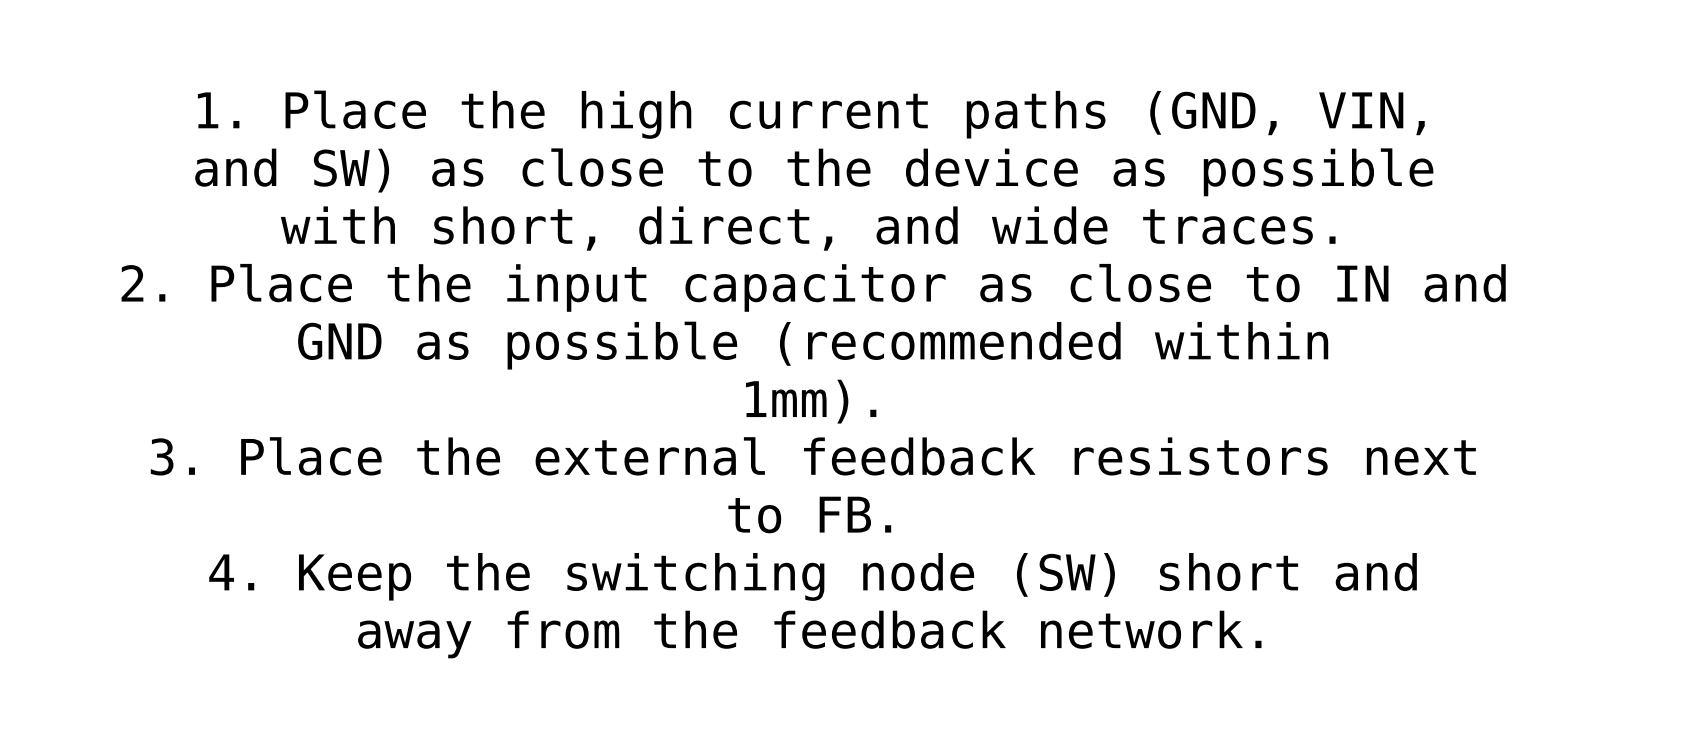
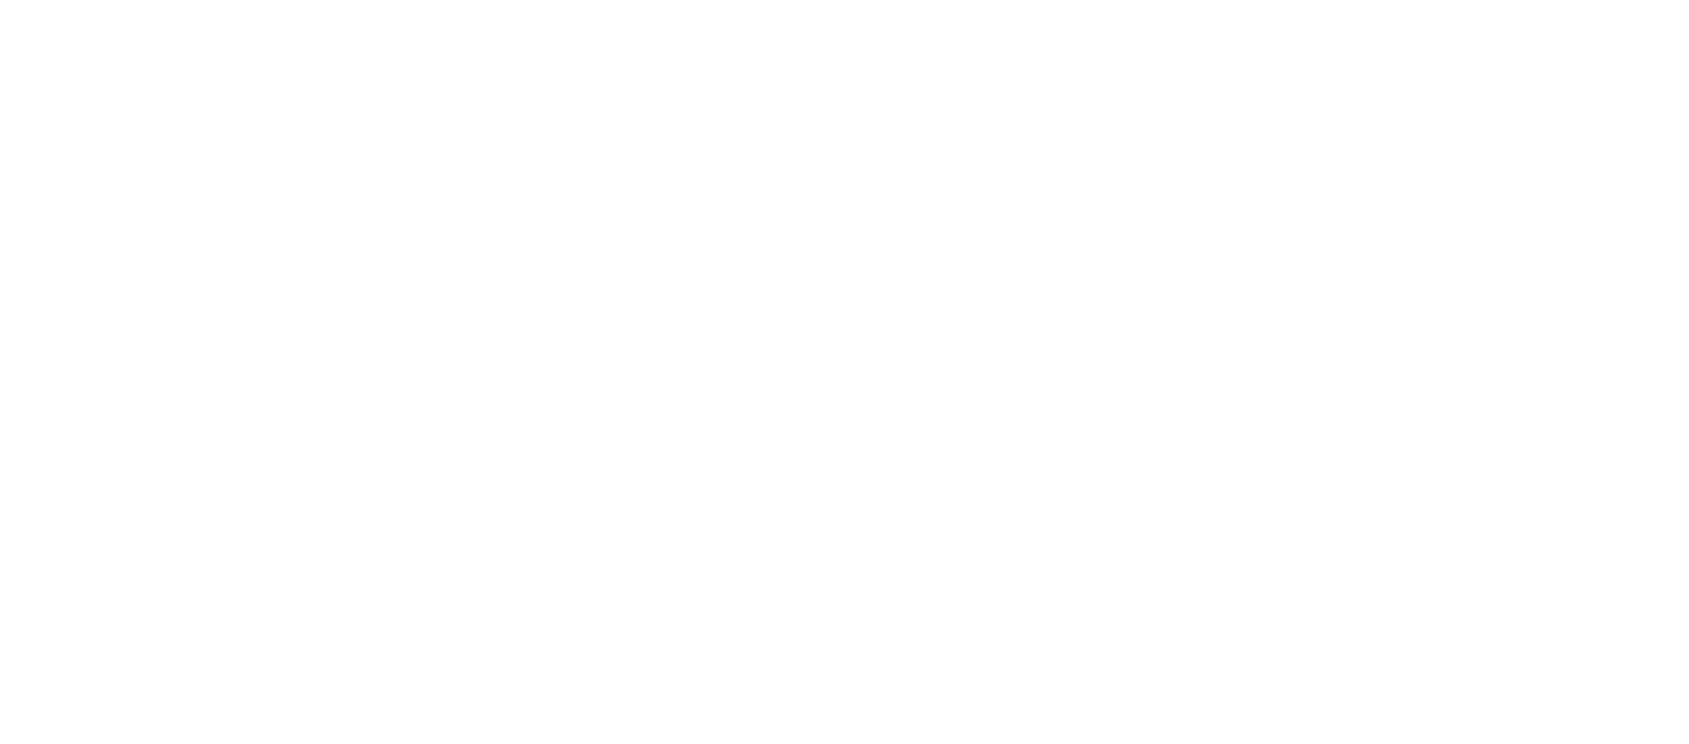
text: 1. Place the high current paths (GND, VIN, (811, 114) -> none
text: and SW) as close to the device as possible (814, 172) -> none
text: with short, direct, and wide traces. (808, 228) -> none
text: 2. Place the input capacitor as close to IN and (813, 287) -> none
text: GND as possible (recommended within (813, 345) -> none
text: 1mm). (811, 401) -> none
text: 3. Place the external feedback resistors next (813, 456) -> none
text: to FB. (809, 515) -> none
text: 4. Keep the switching node (SW) short and (813, 576) -> none
text: away from the feedback network. (809, 634) -> none

